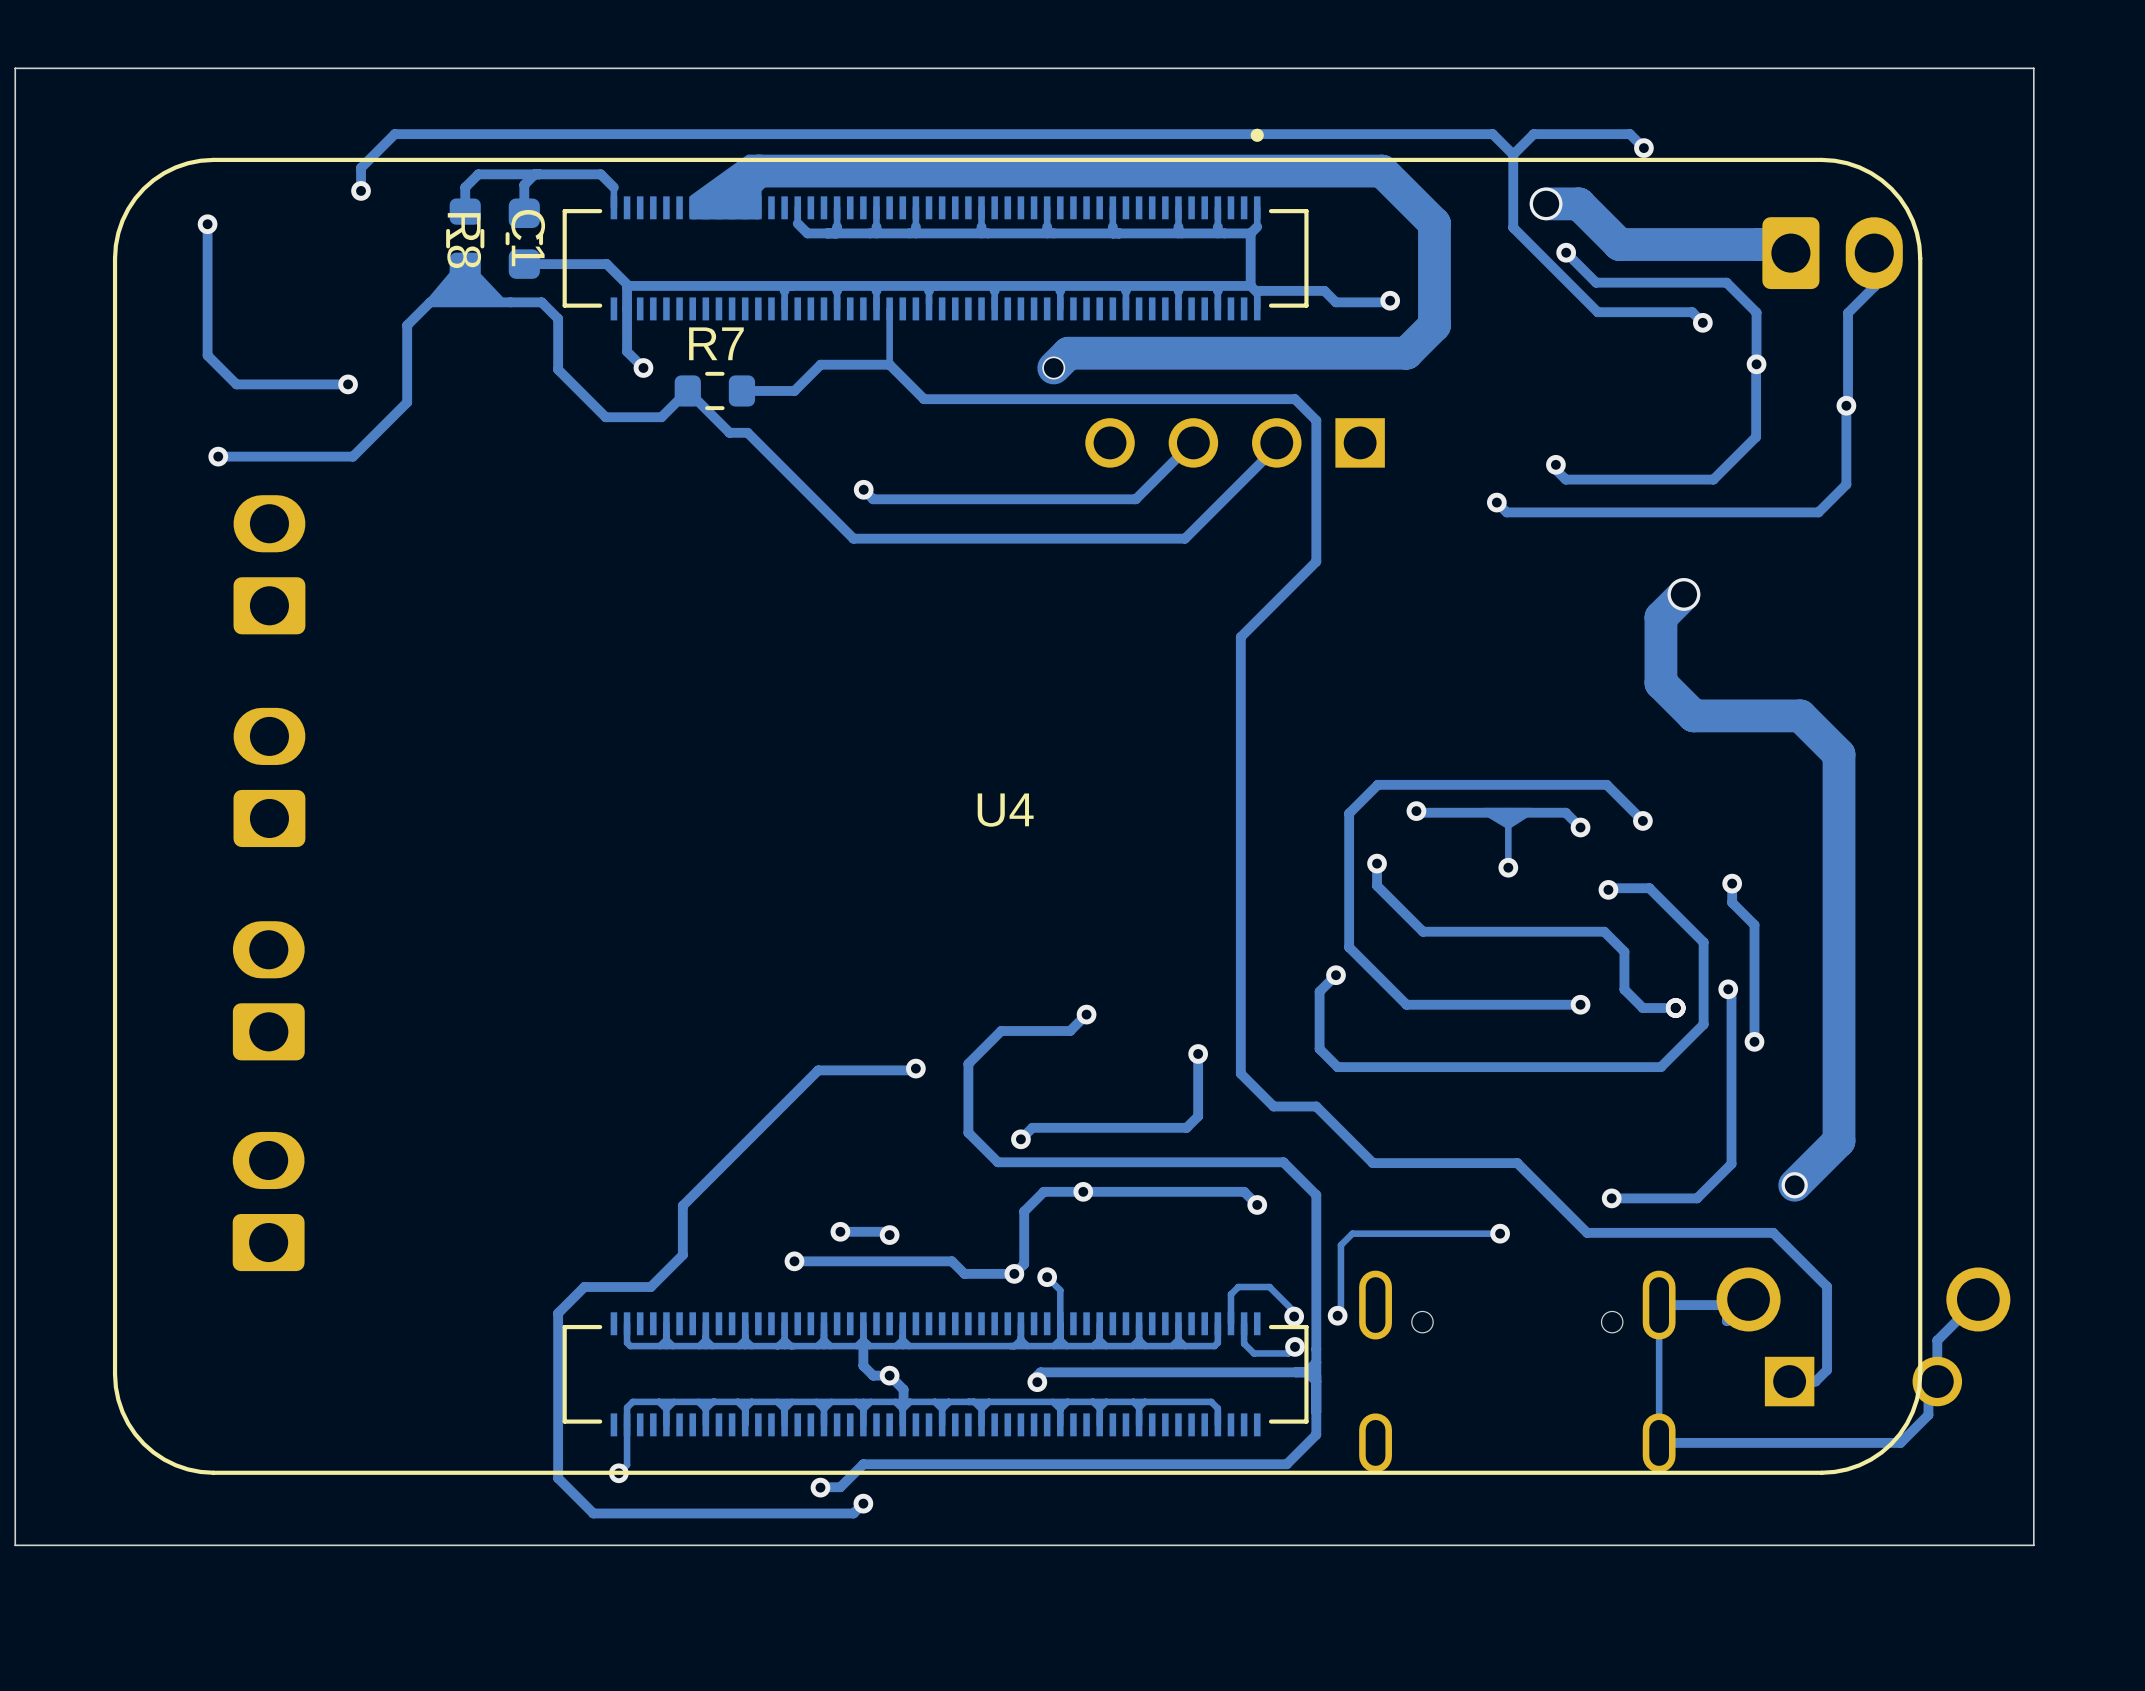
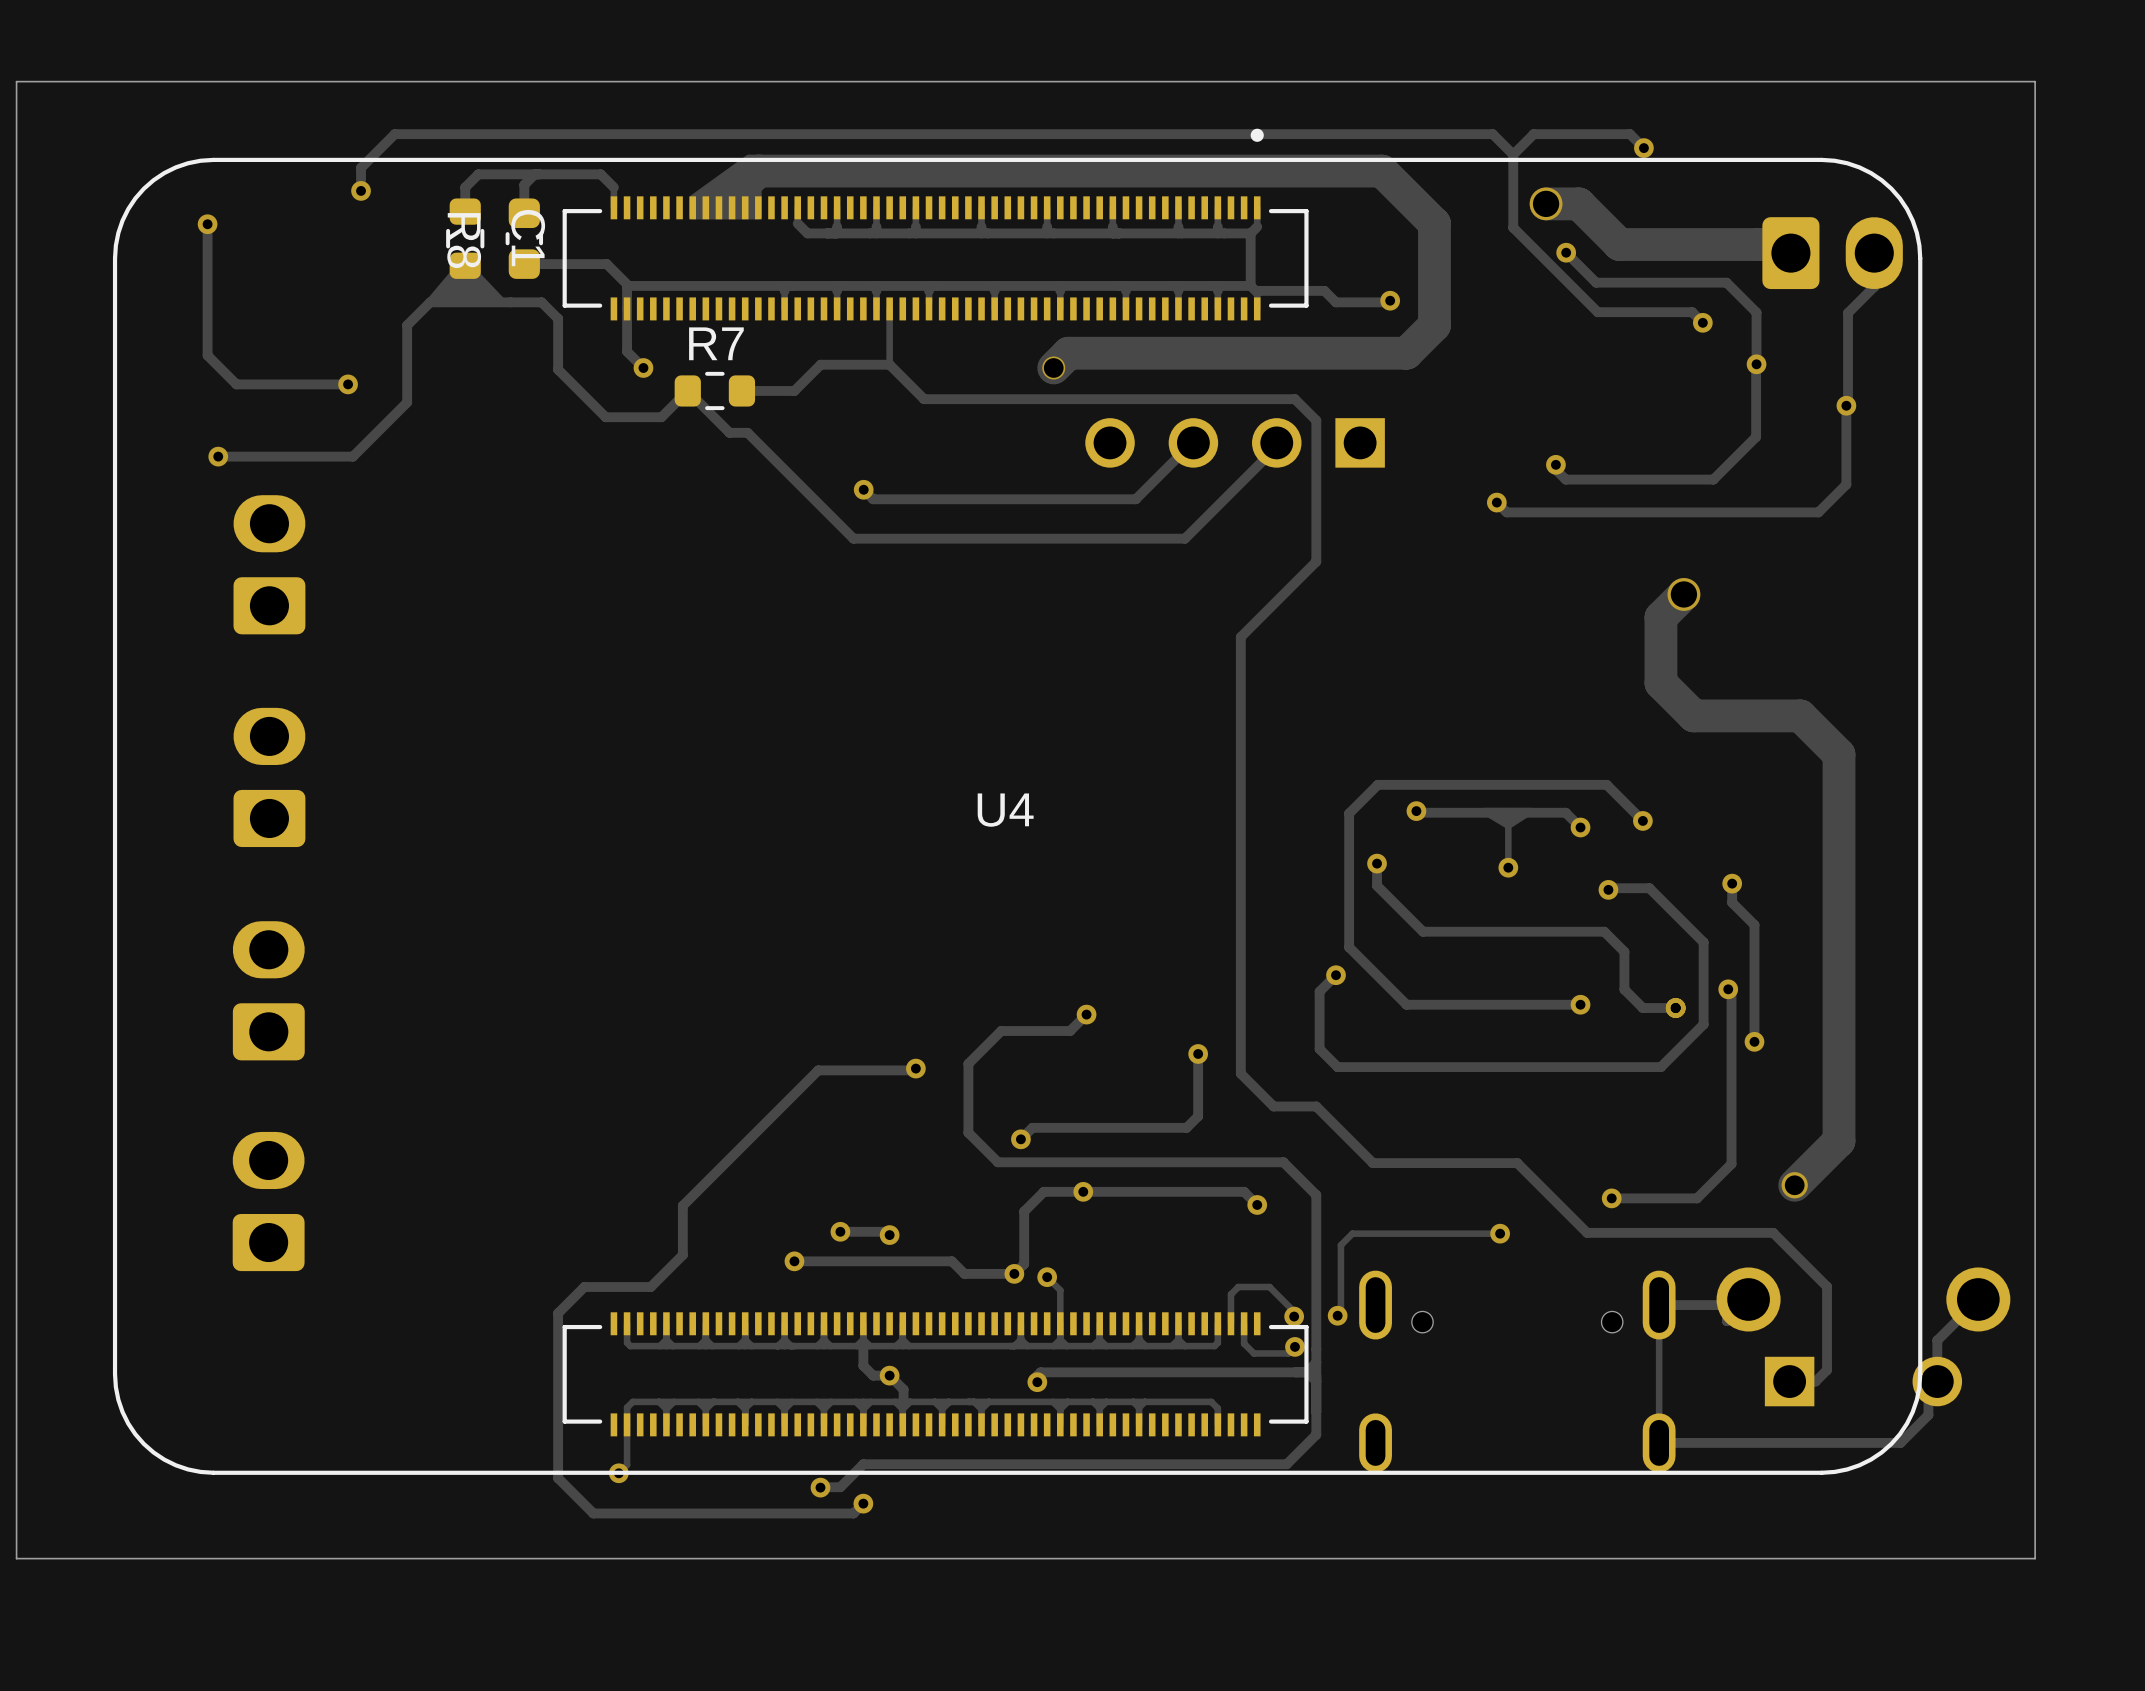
board edge: (2033, 68) (15, 68) (15, 1545) (2033, 1545) (2033, 68) -> (2035, 81) (16, 81) (16, 1558) (2035, 1558) (2035, 81)

